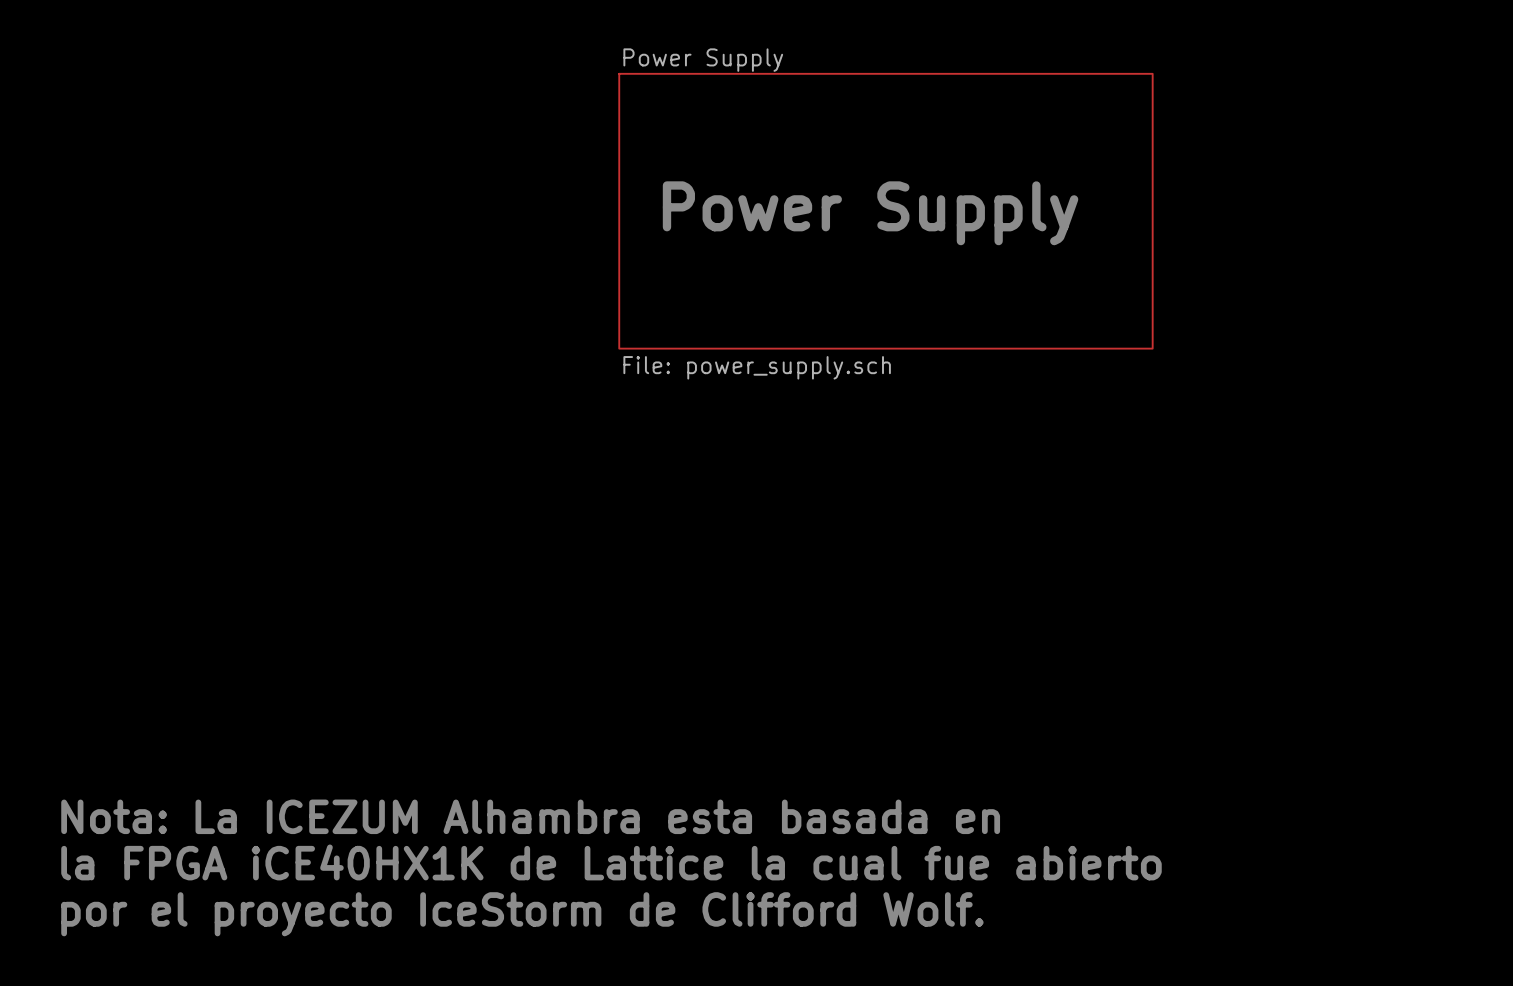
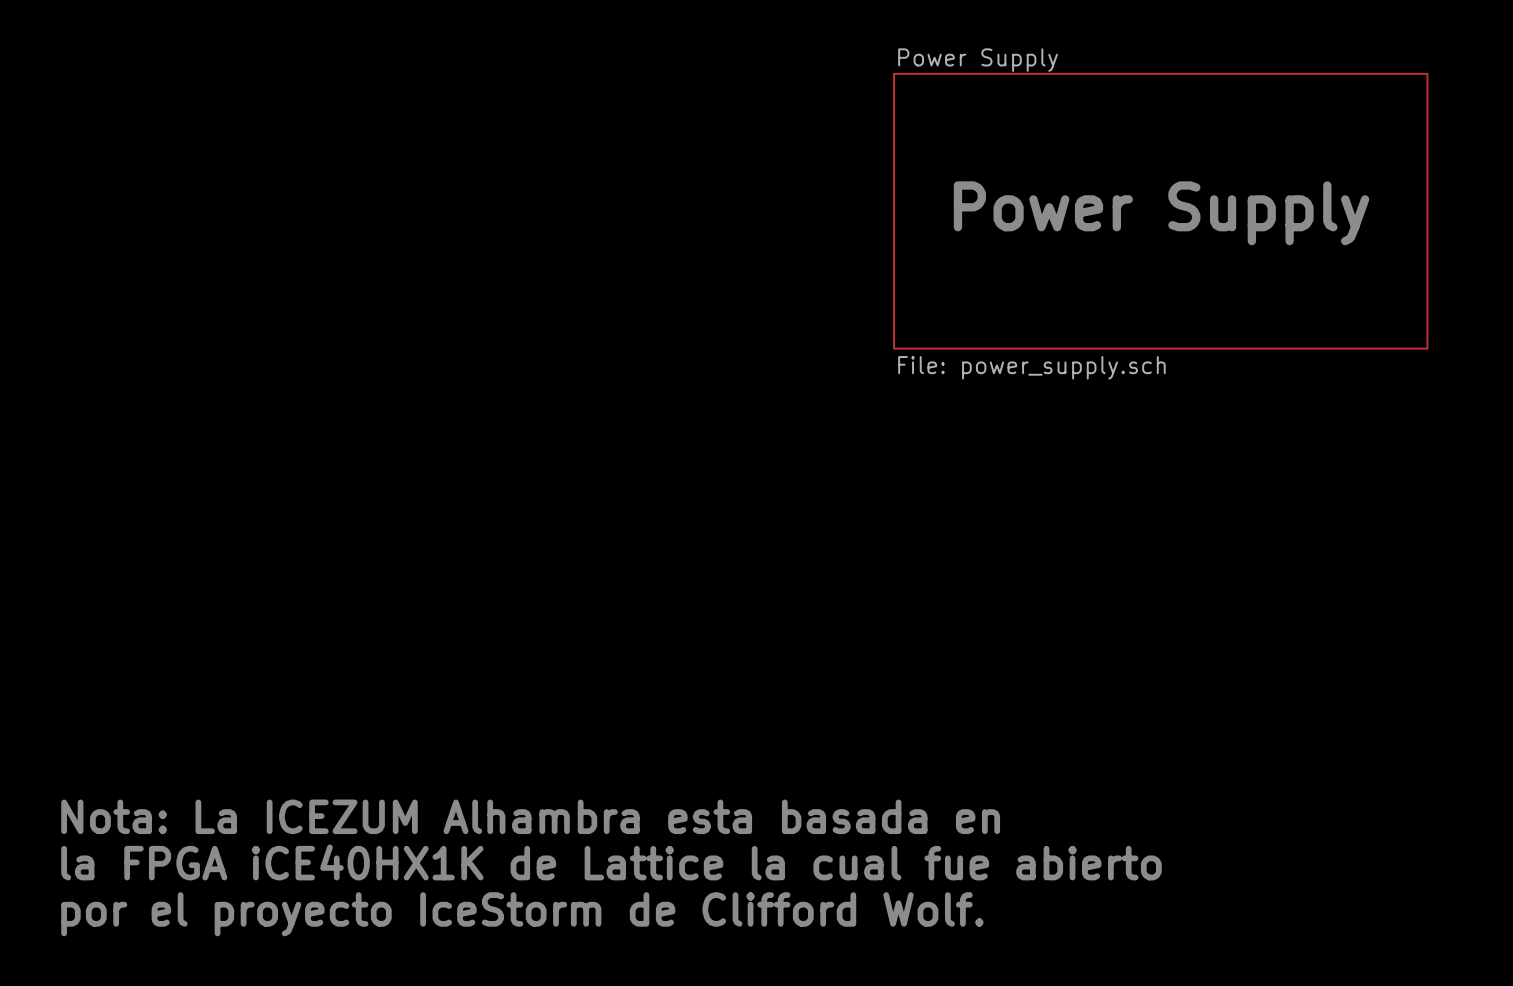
sheet Power Supply position: (885, 211) -> (1160, 211)
text position: Power Supply (870, 213) -> Power Supply (1161, 213)

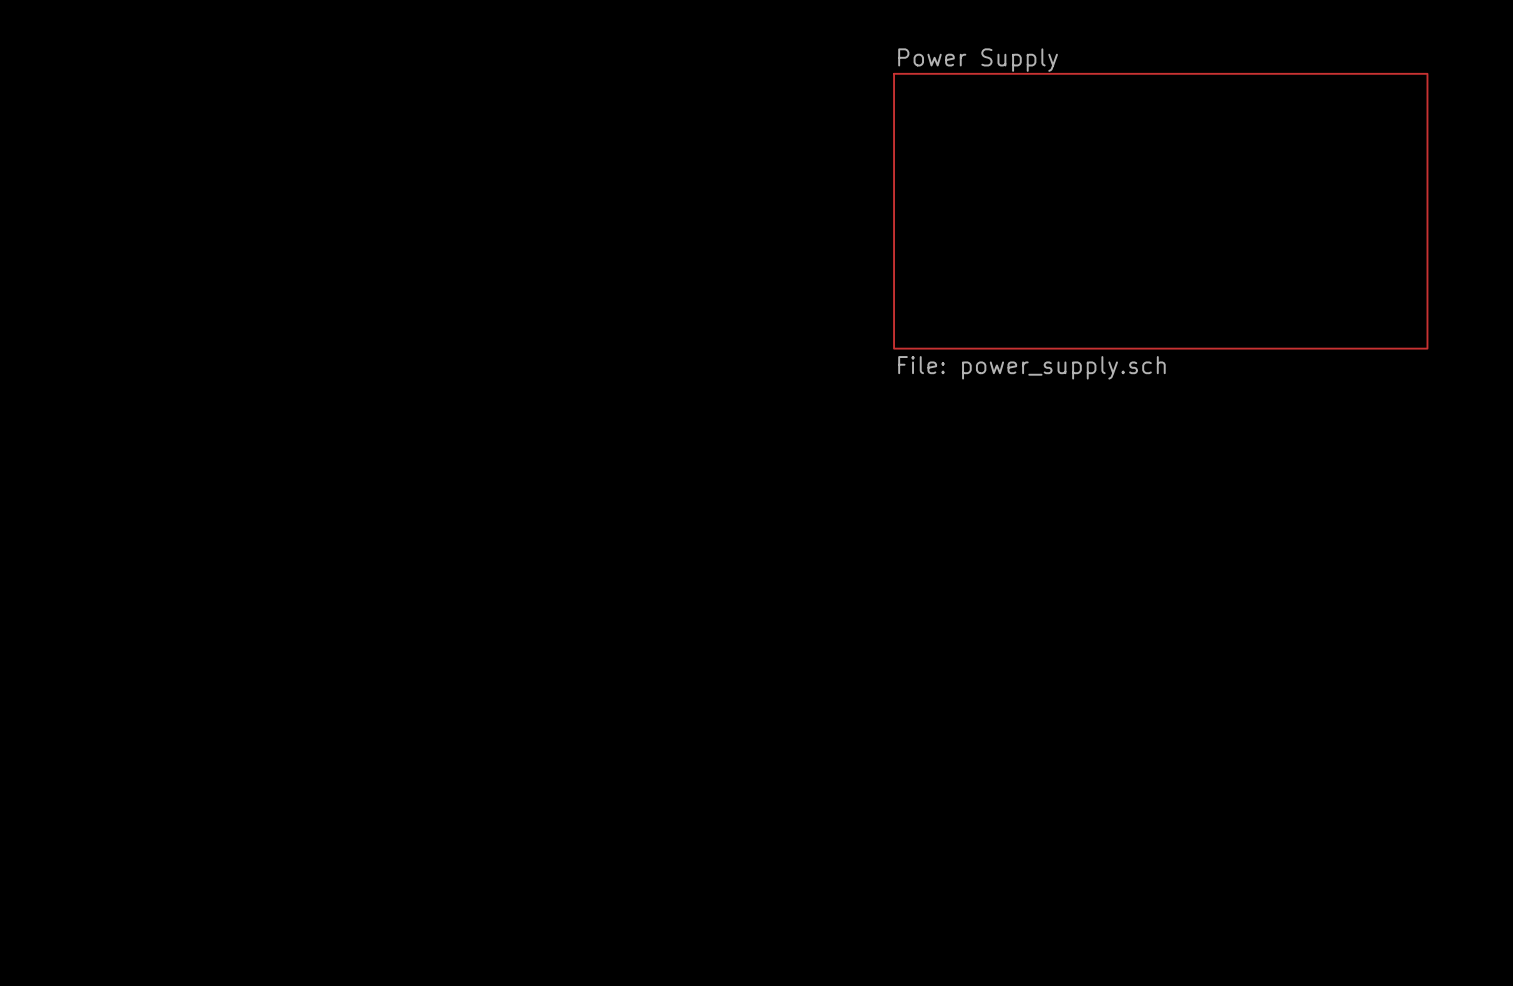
text: Power Supply (1161, 213) -> none
text: Nota: La ICEZUM Alhambra esta basada en (530, 816) -> none
text: la FPGA iCE40HX1K de Lattice la cual fue abierto (611, 862) -> none
text: por el proyecto IceStorm de Clifford Wolf. (522, 914) -> none

